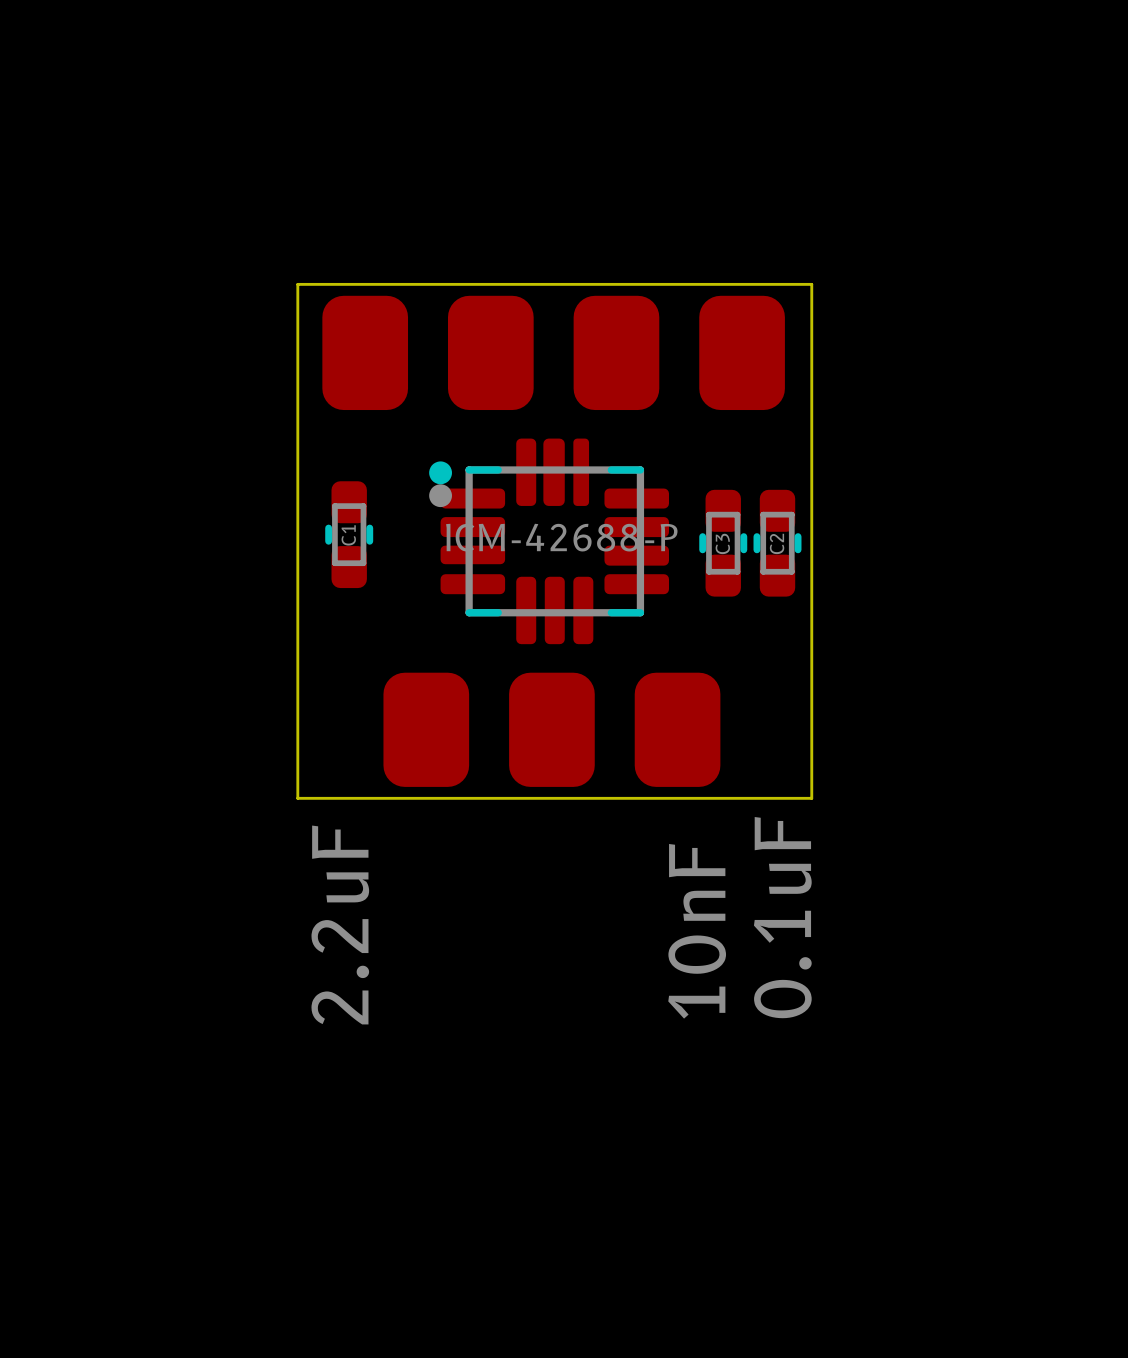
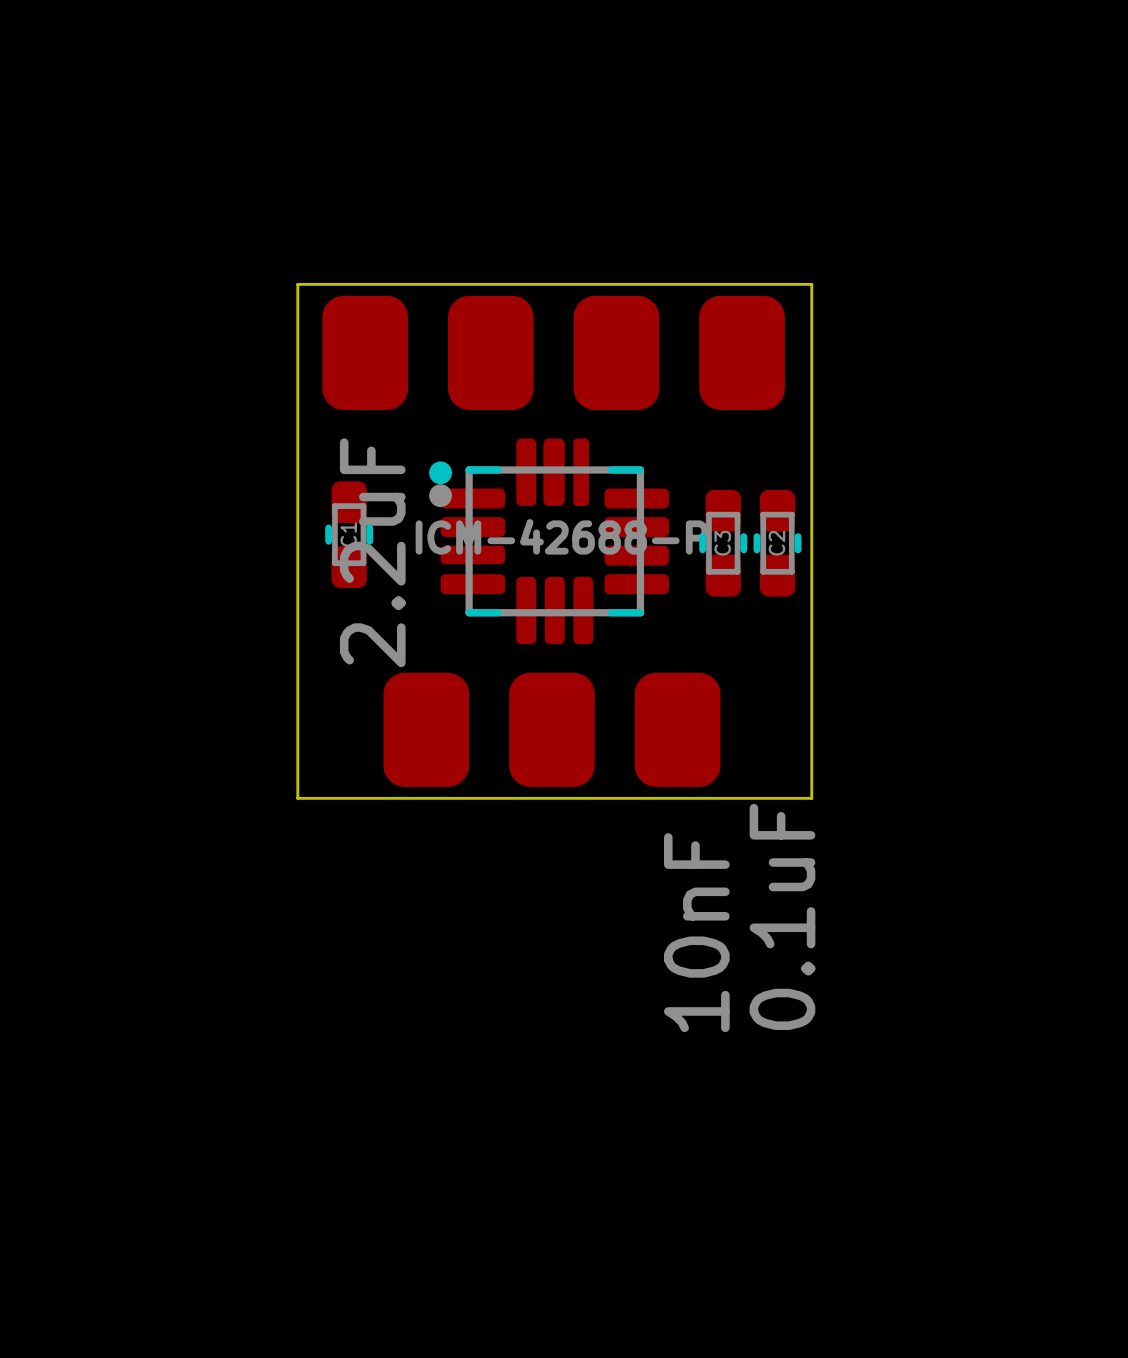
C1 value position: 2.2uF (340, 925) -> 2.2uF (372, 552)

